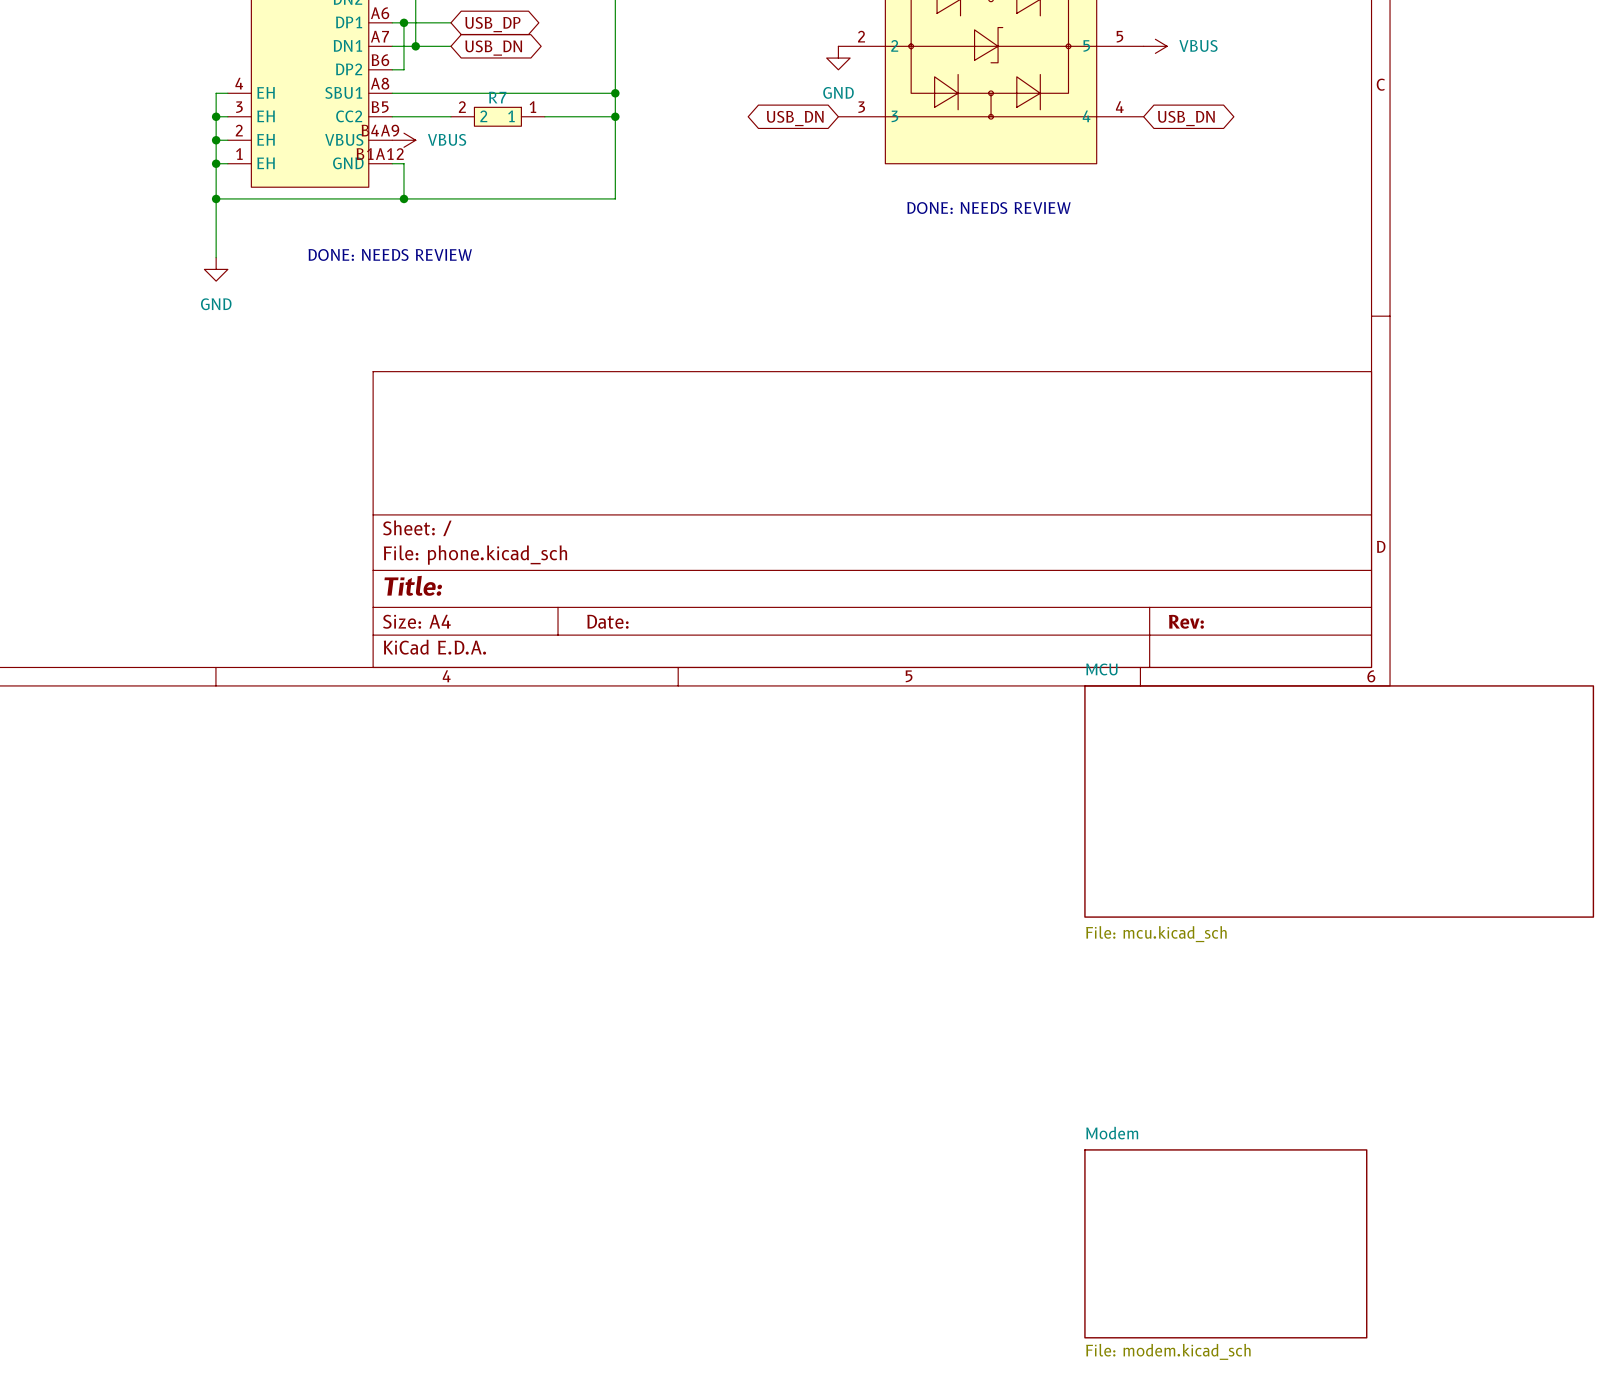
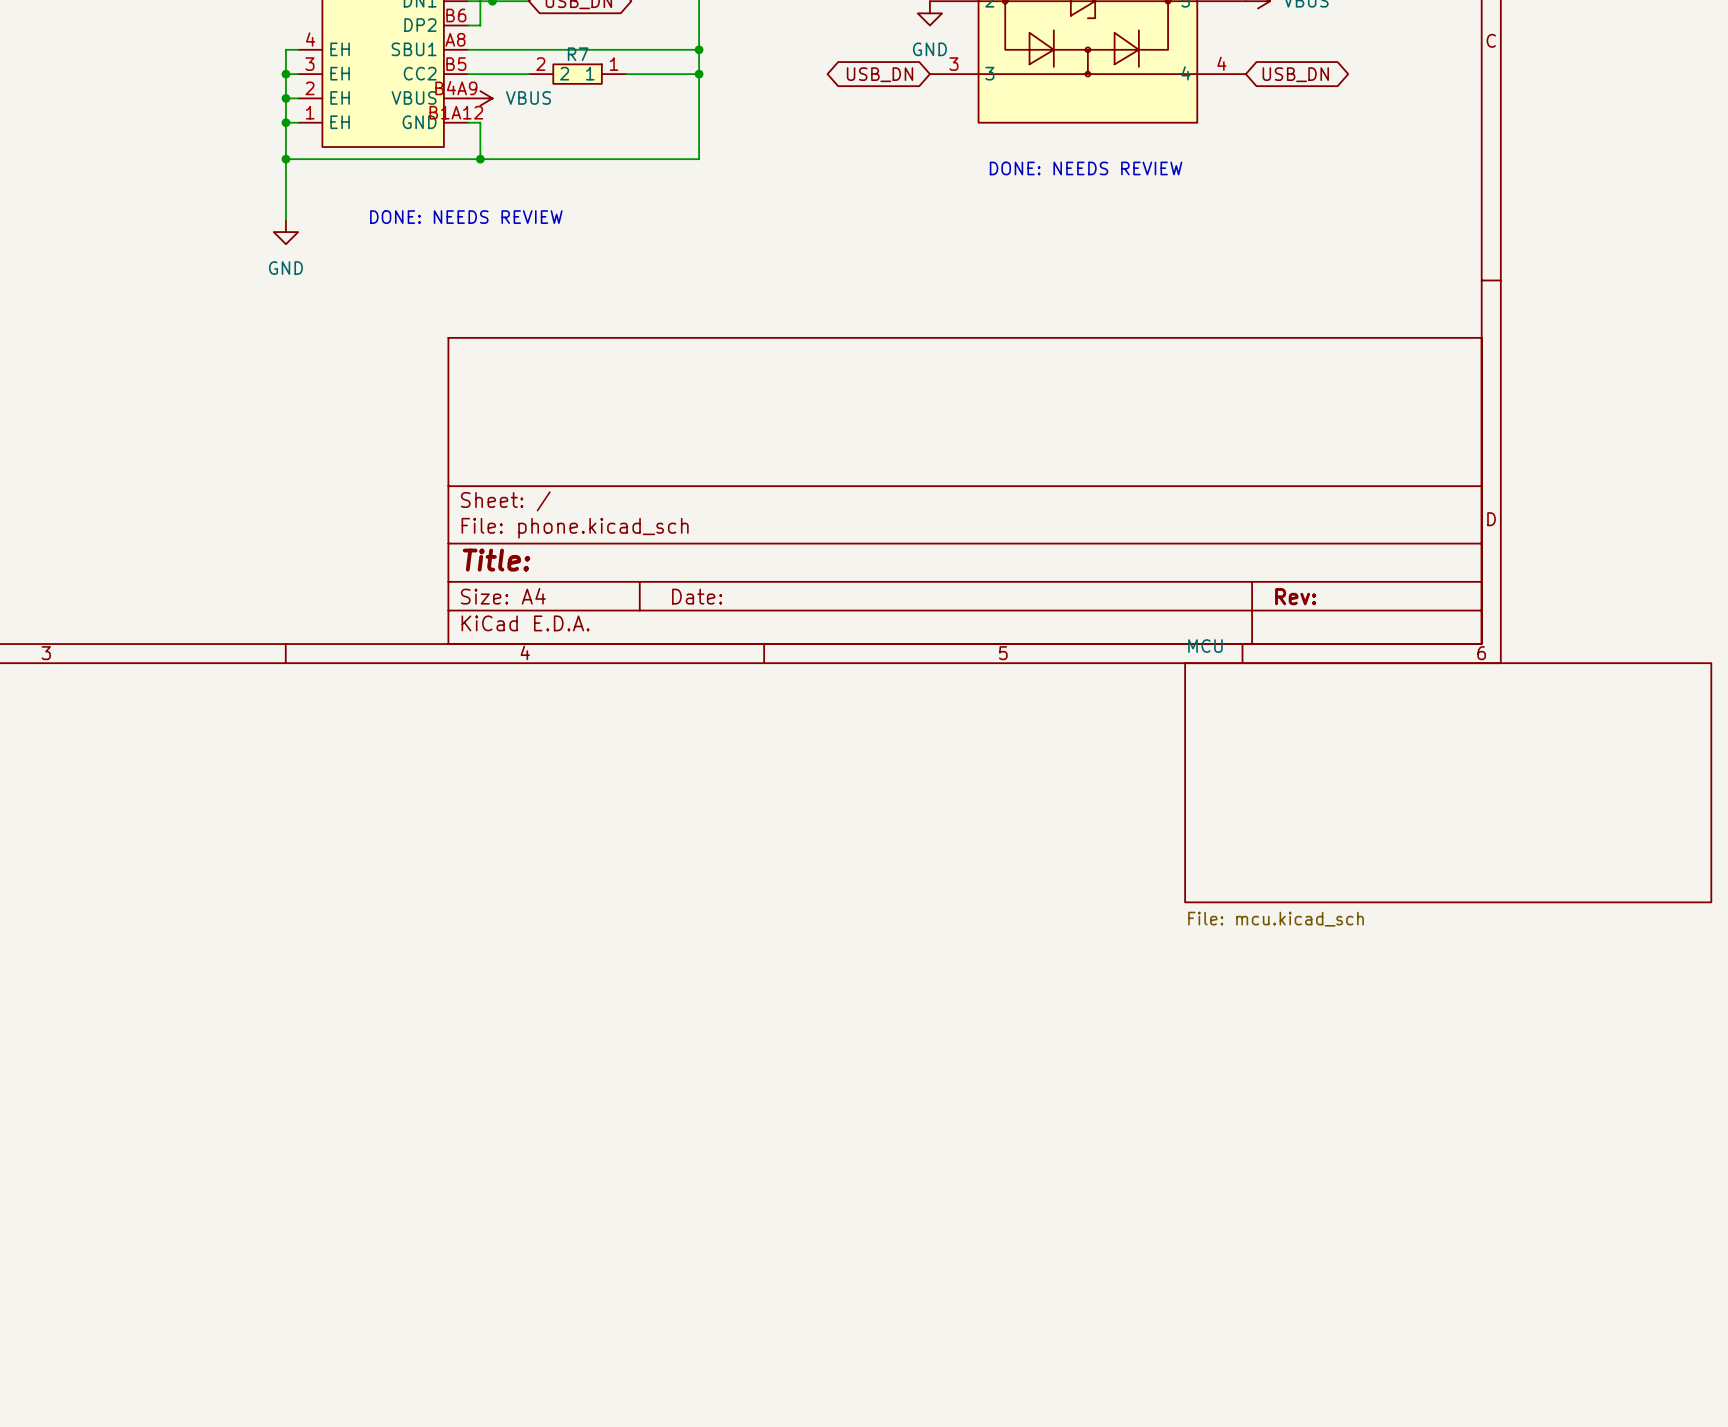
sheet Modem: File: modem.kicad_sch (1225, 1243) -> none

